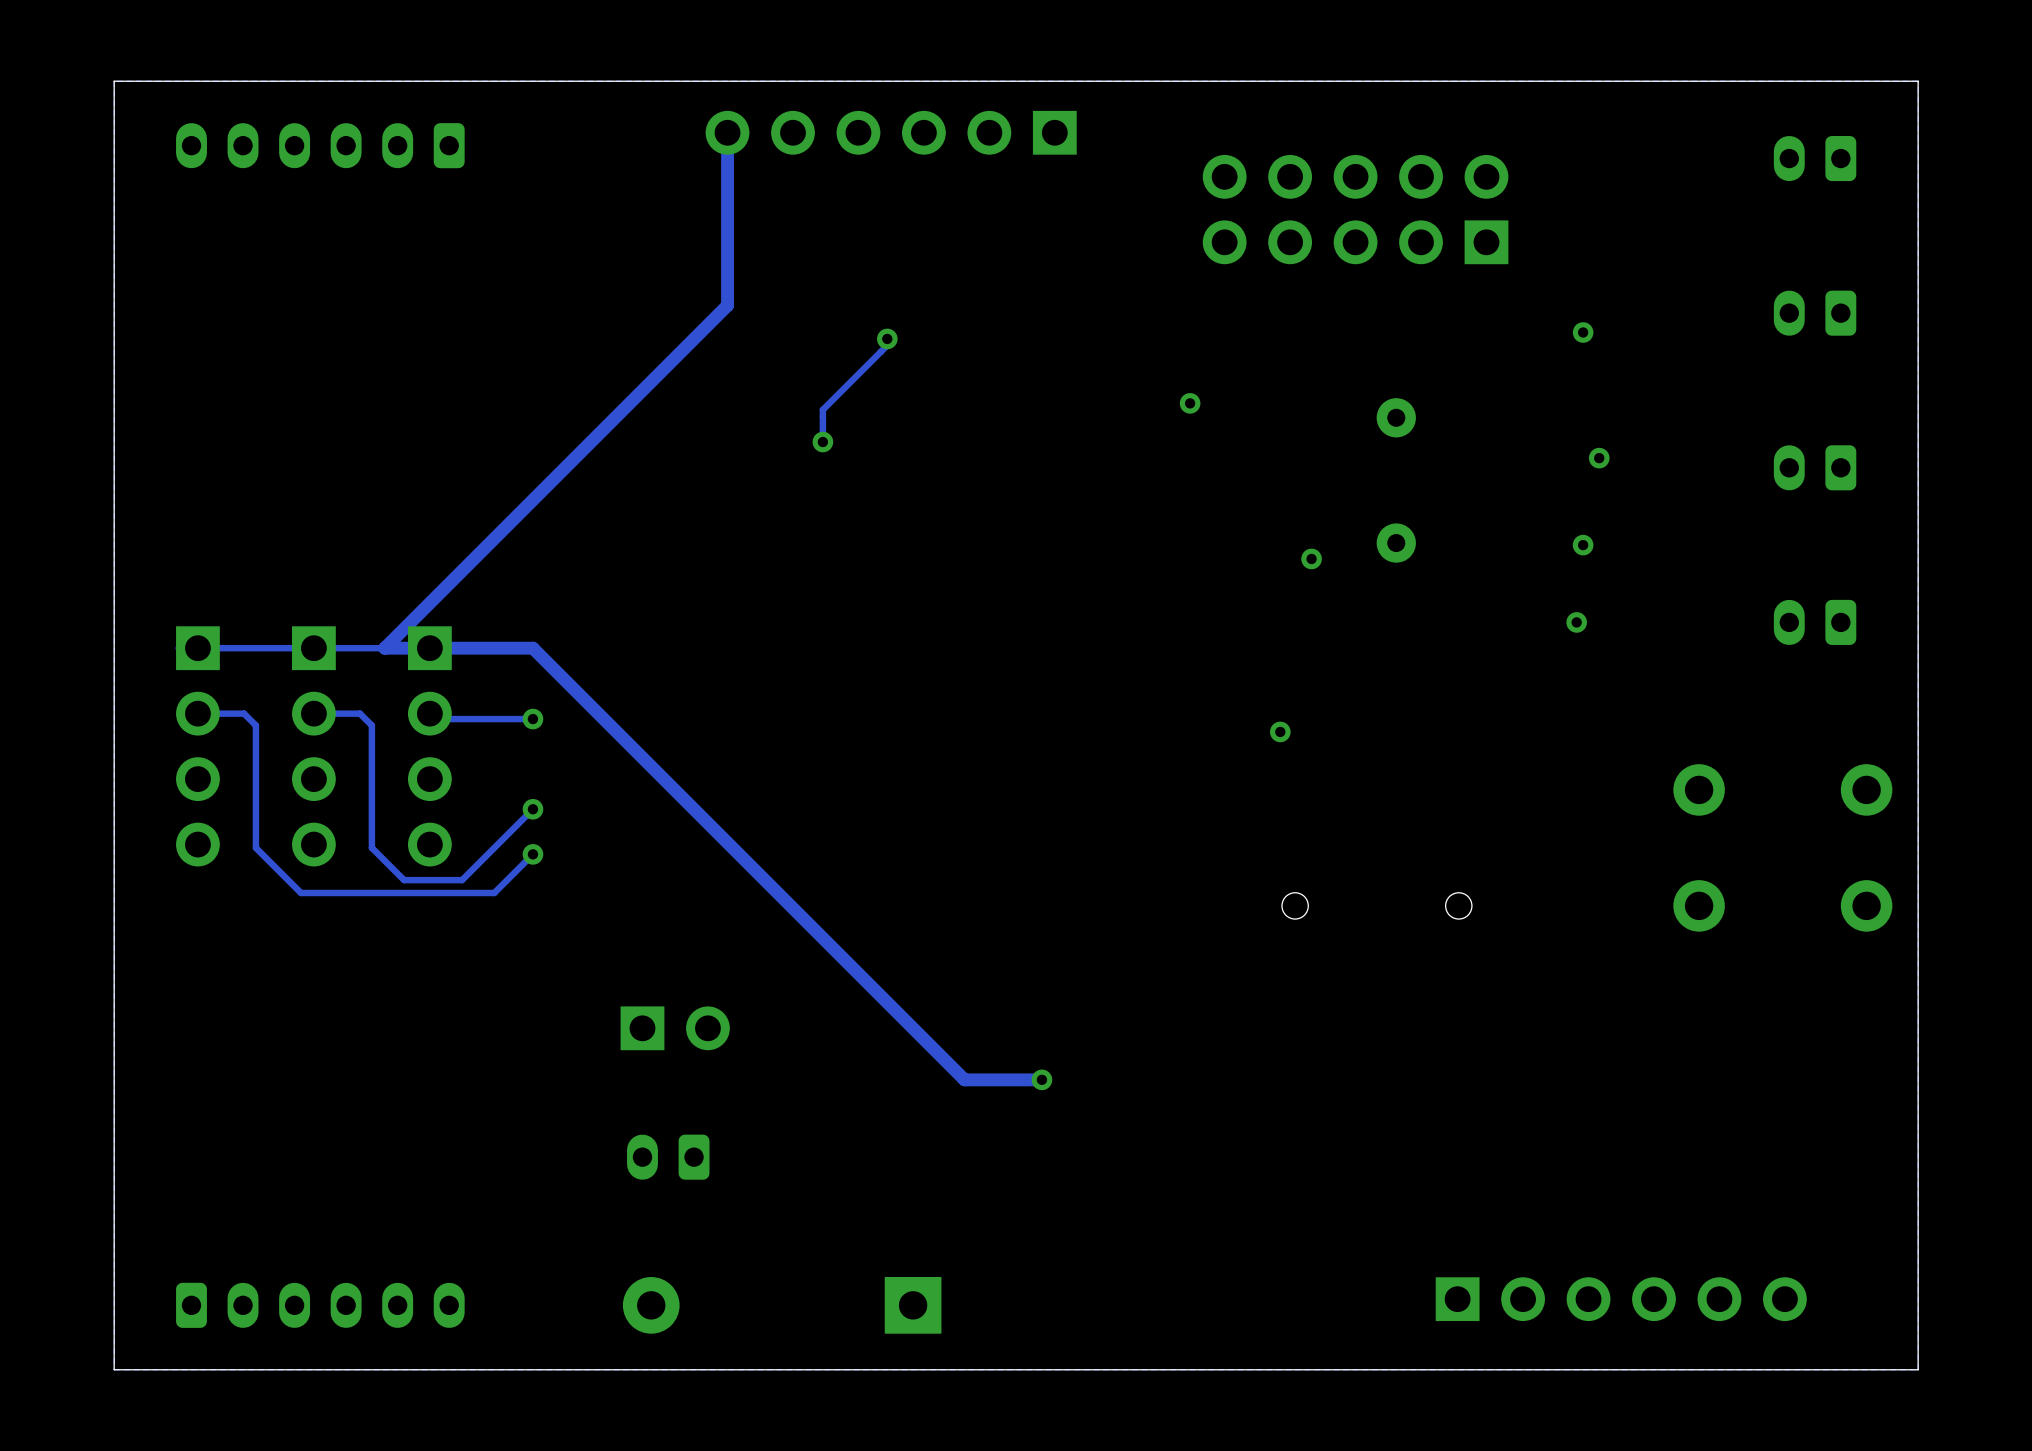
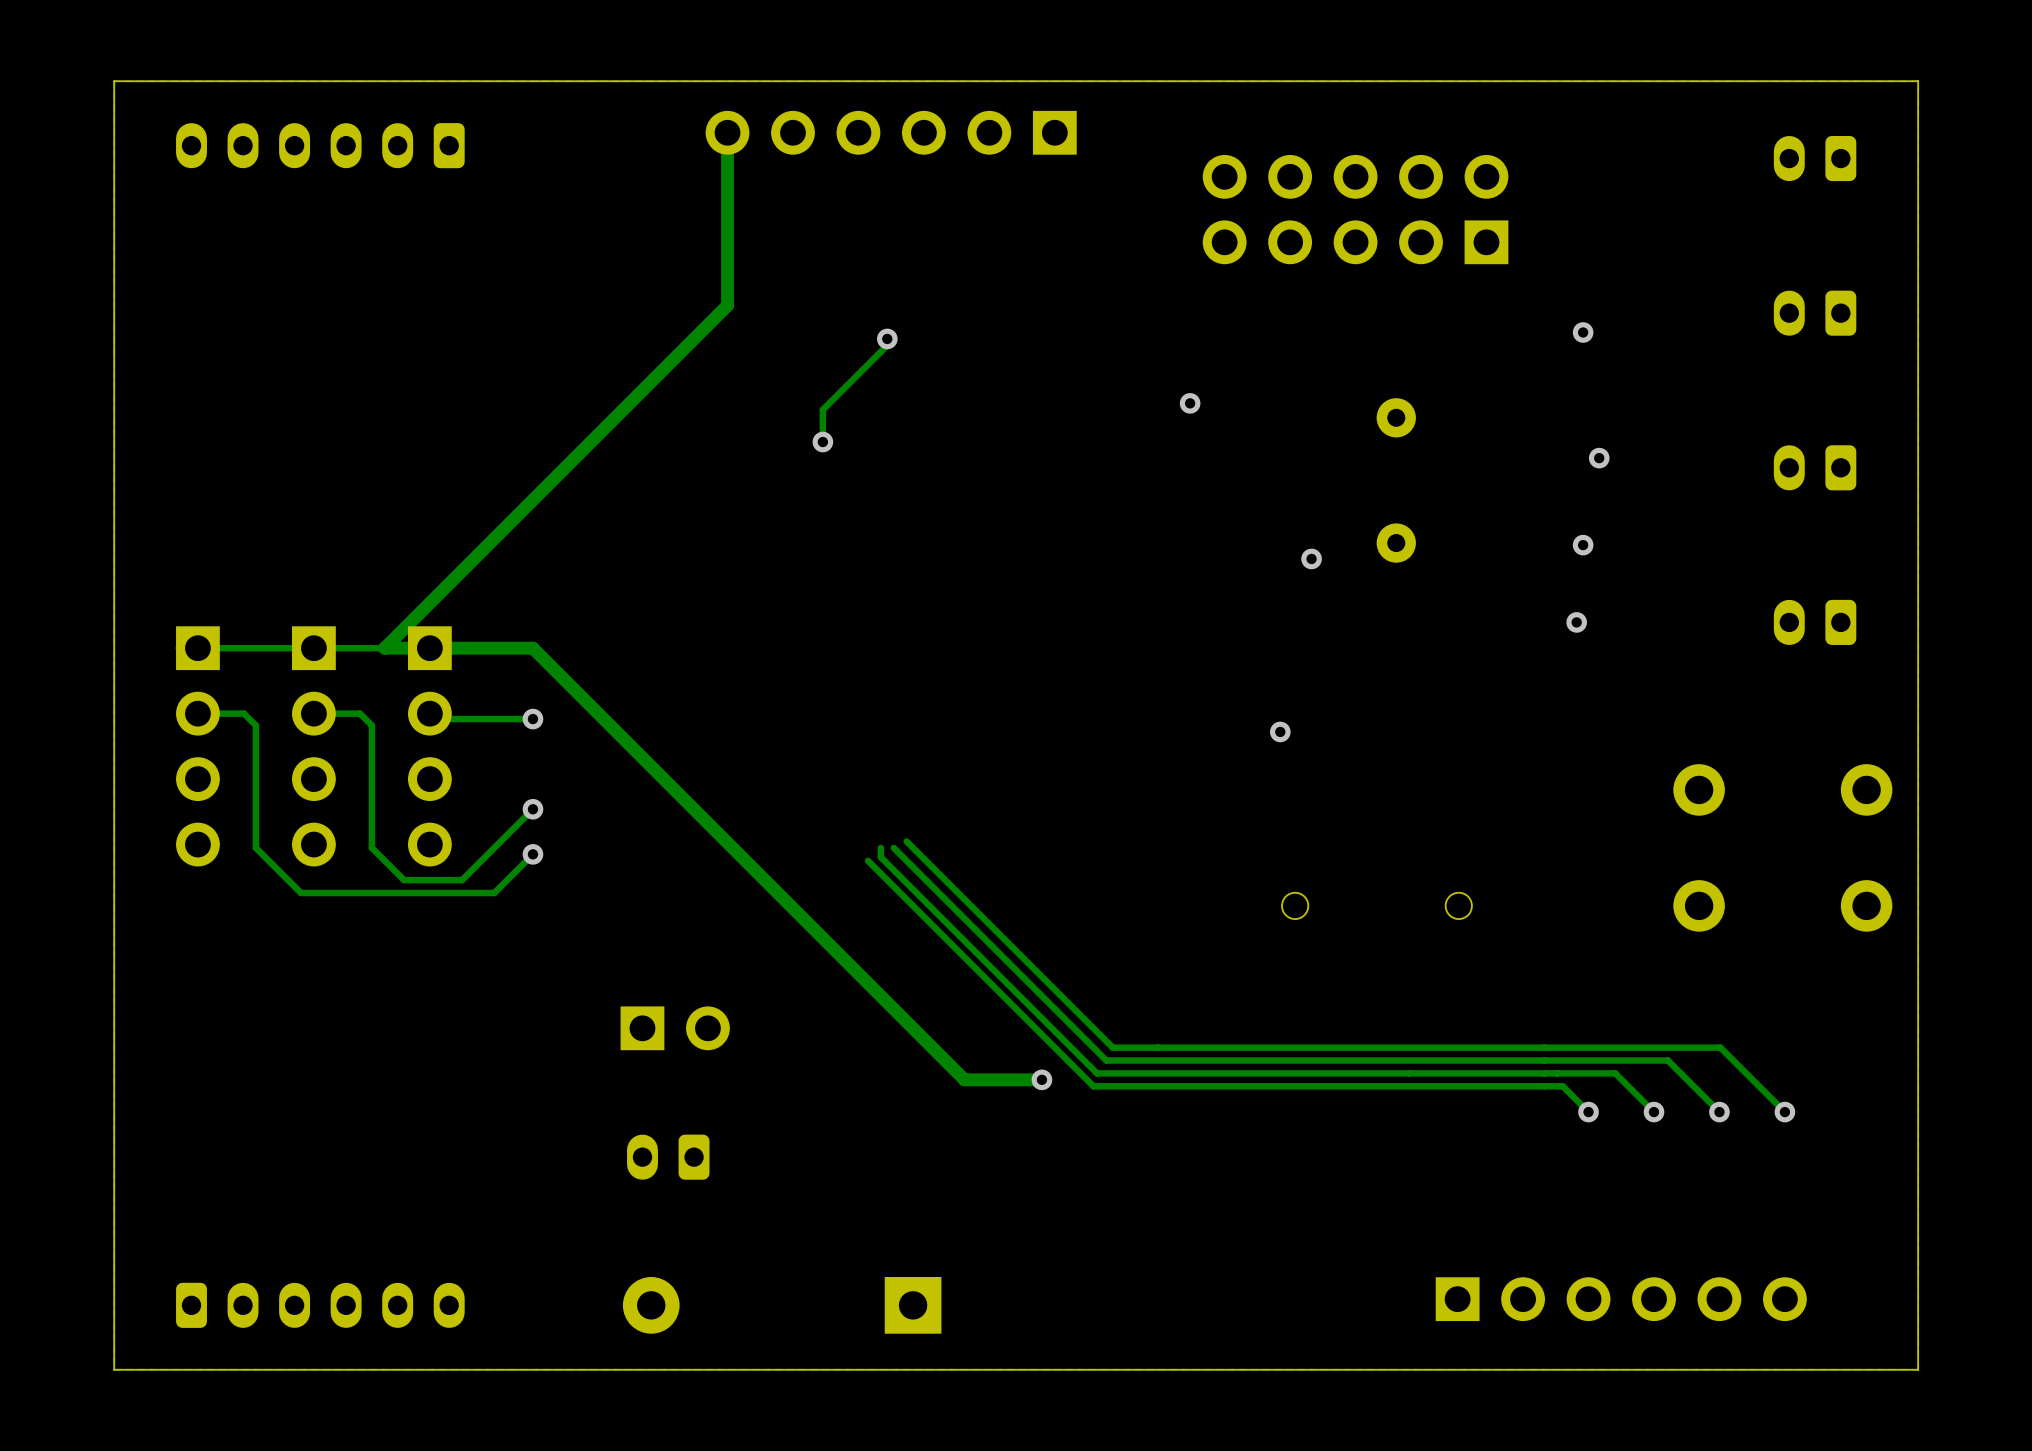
track: none -> (906, 841) (1112, 1047) (1720, 1047) (1784, 1112)
track: none -> (880, 847) (880, 857) (1096, 1073) (1615, 1073) (1654, 1112)
track: none -> (893, 847) (1106, 1060) (1667, 1060) (1719, 1112)
track: none -> (867, 860) (1093, 1086) (1562, 1086) (1588, 1112)
via: none -> (1588, 1112)
via: none -> (1654, 1112)
via: none -> (1719, 1112)
via: none -> (1784, 1112)

